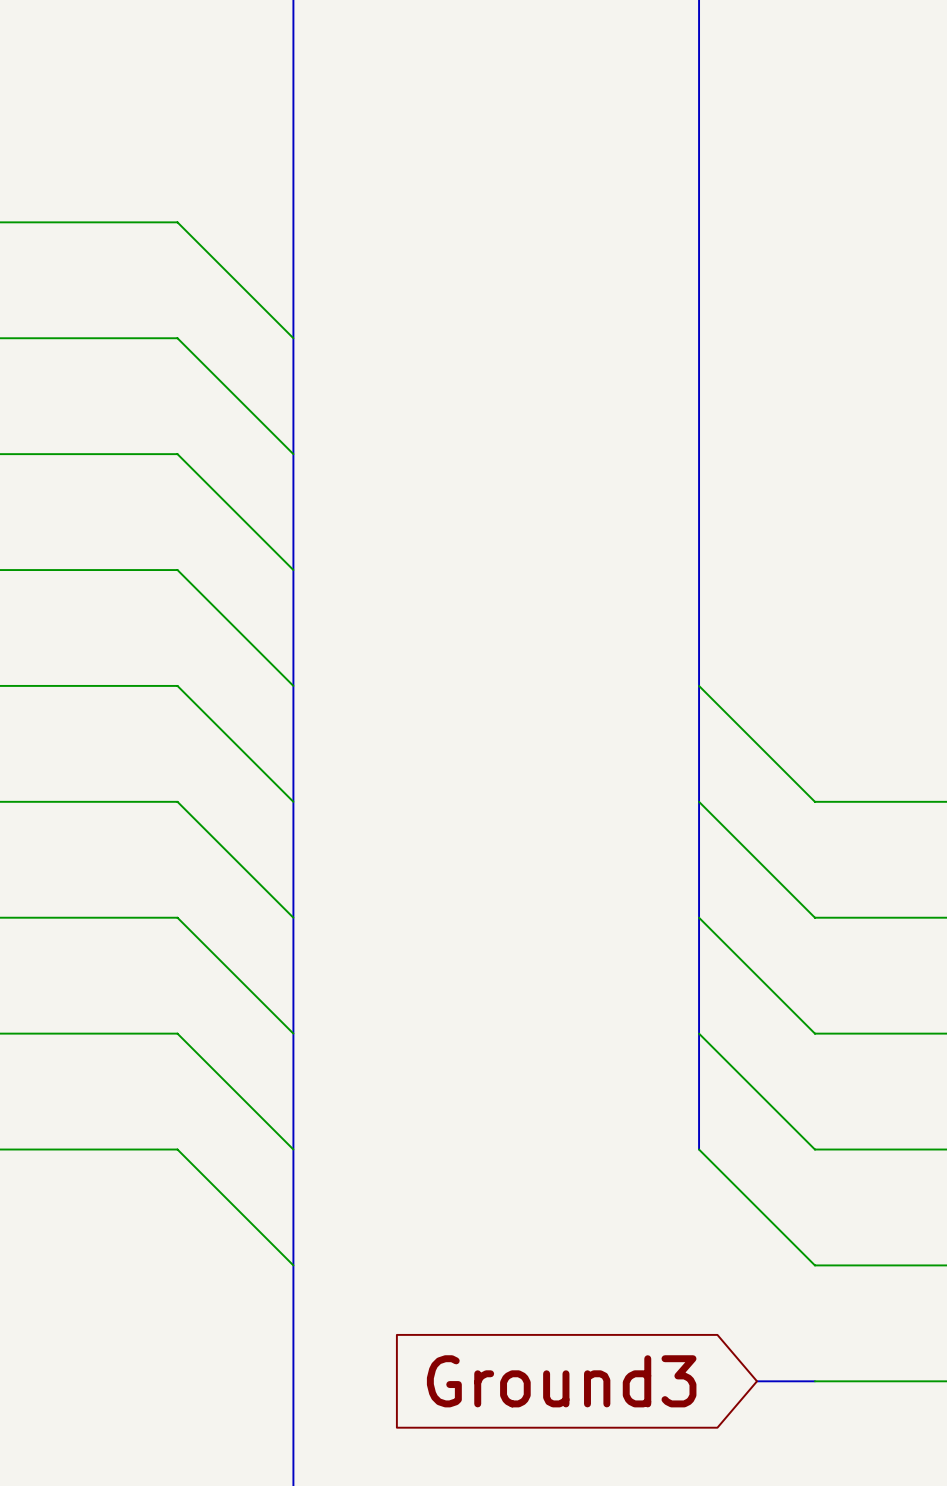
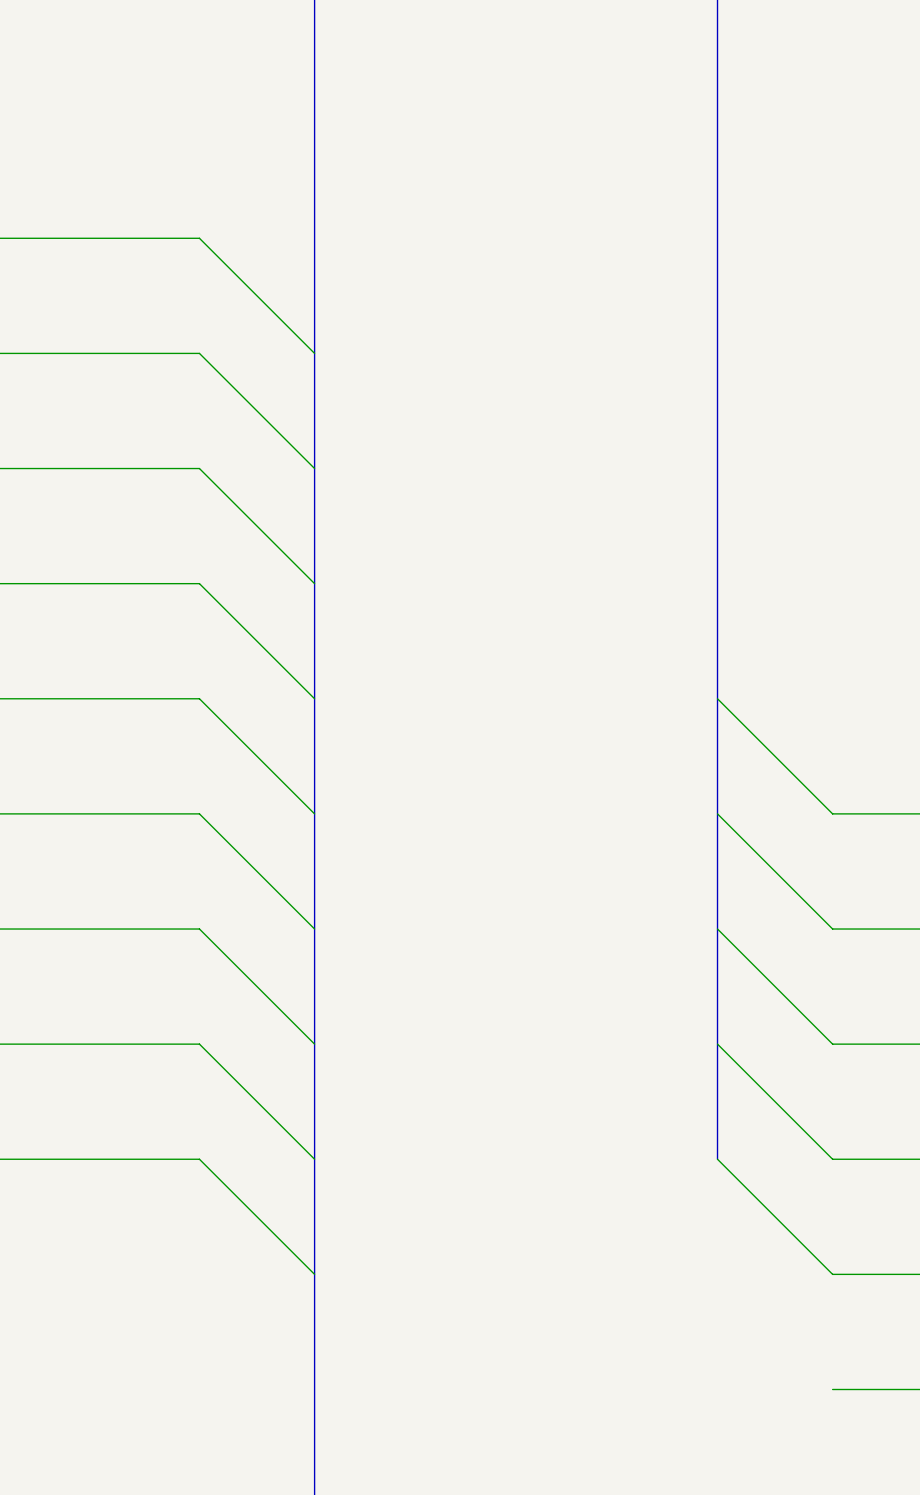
global label: Ground3 (561, 1381) -> none
bus: (757, 1381) (814, 1381) -> none

